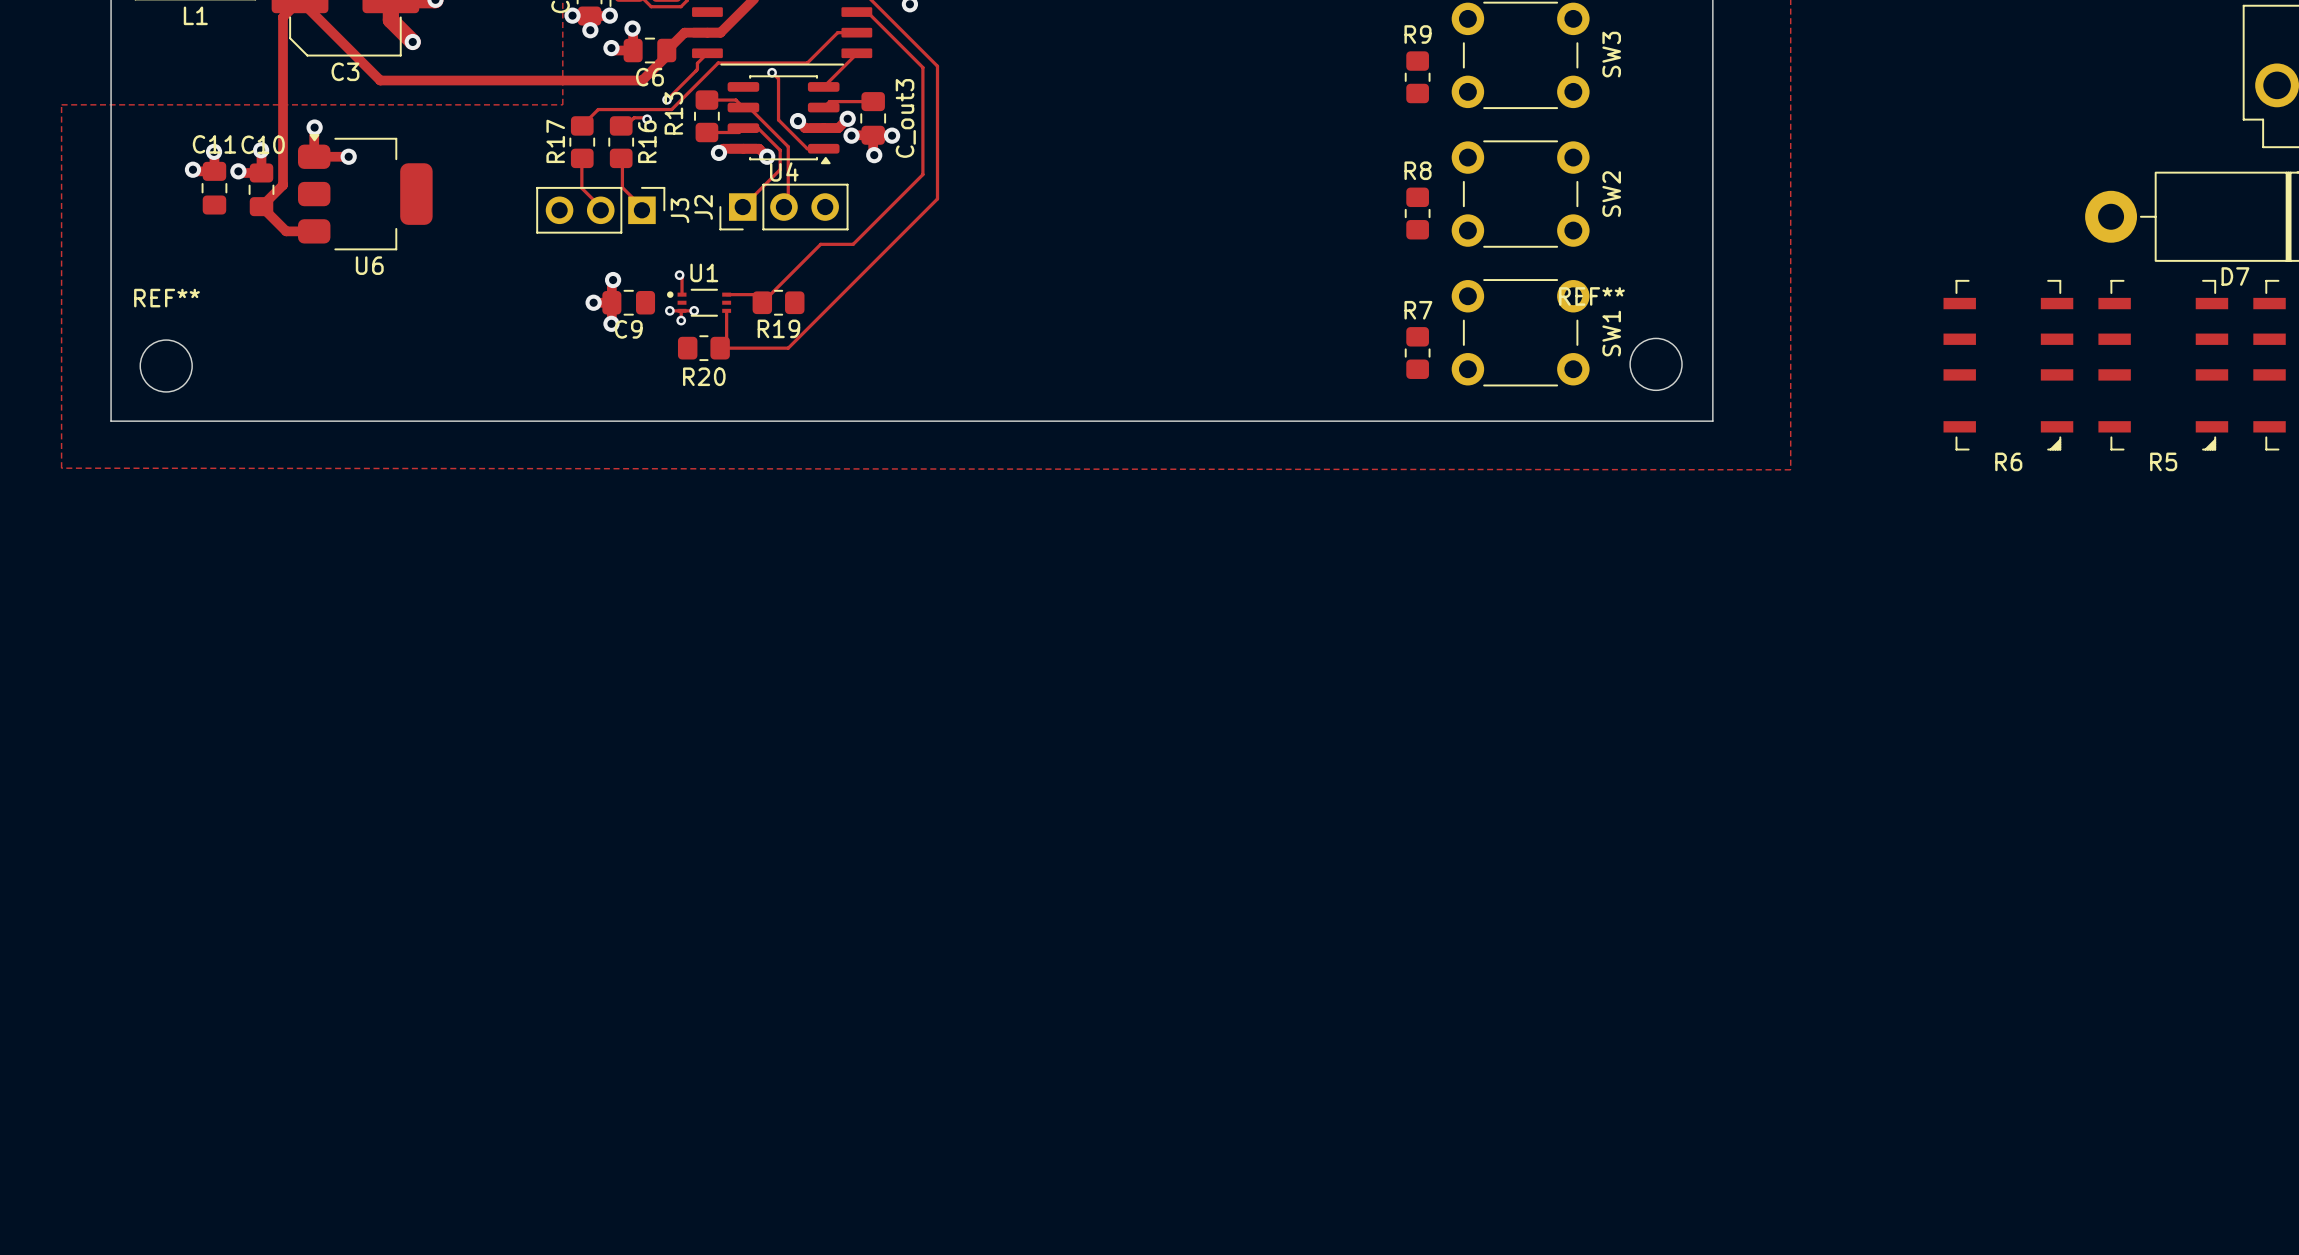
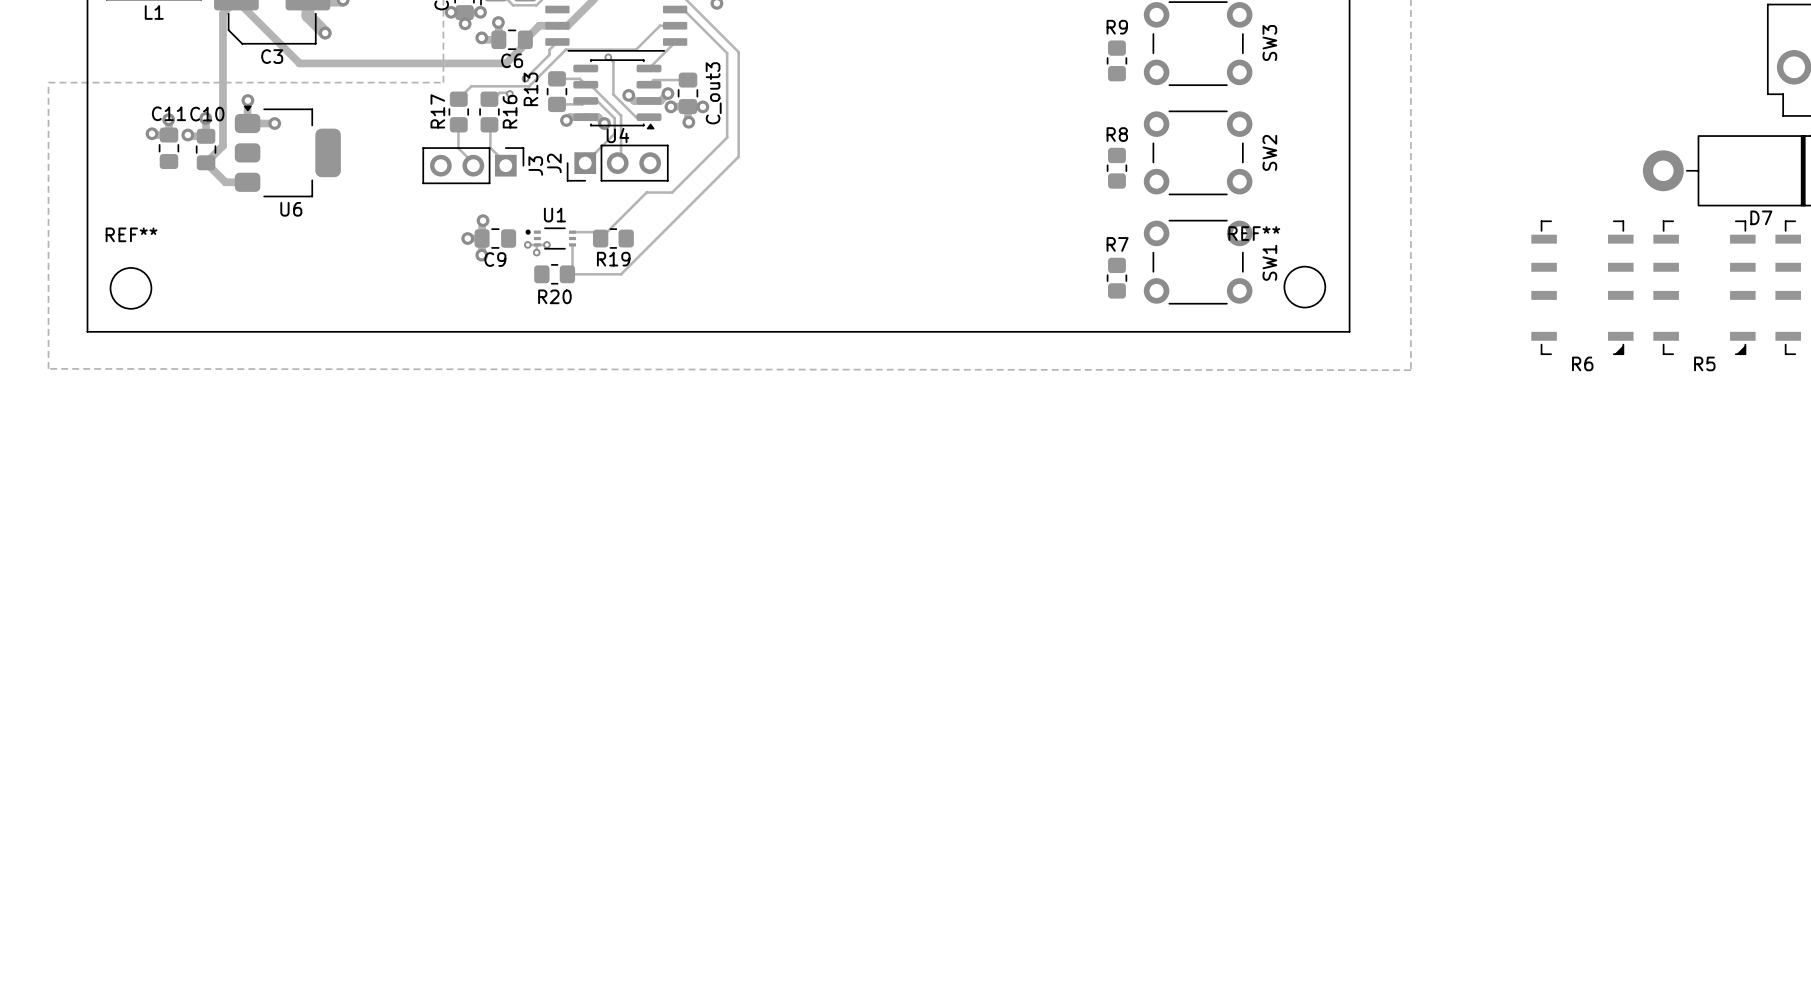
track: (679, 275) (682, 277) (682, 294) -> none
via: (679, 275) -> none

